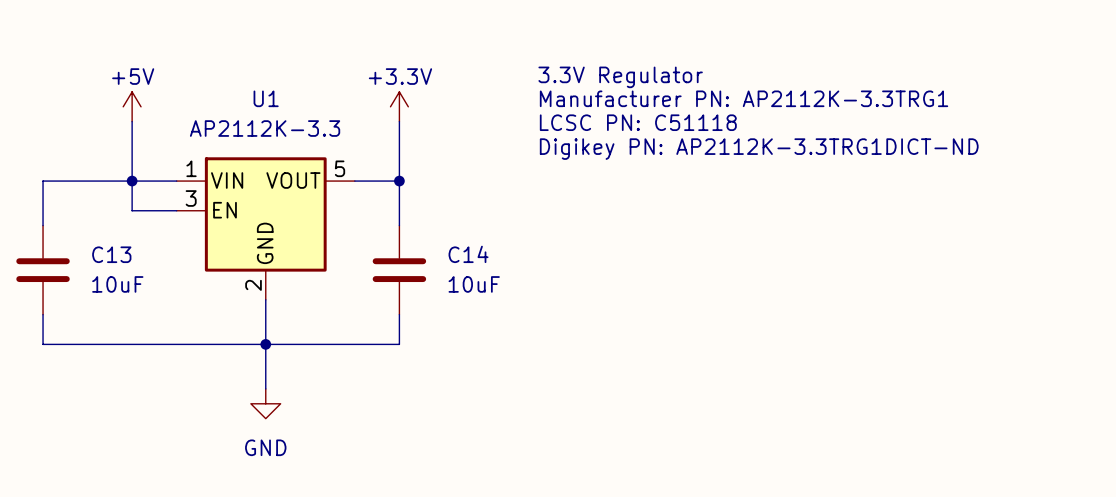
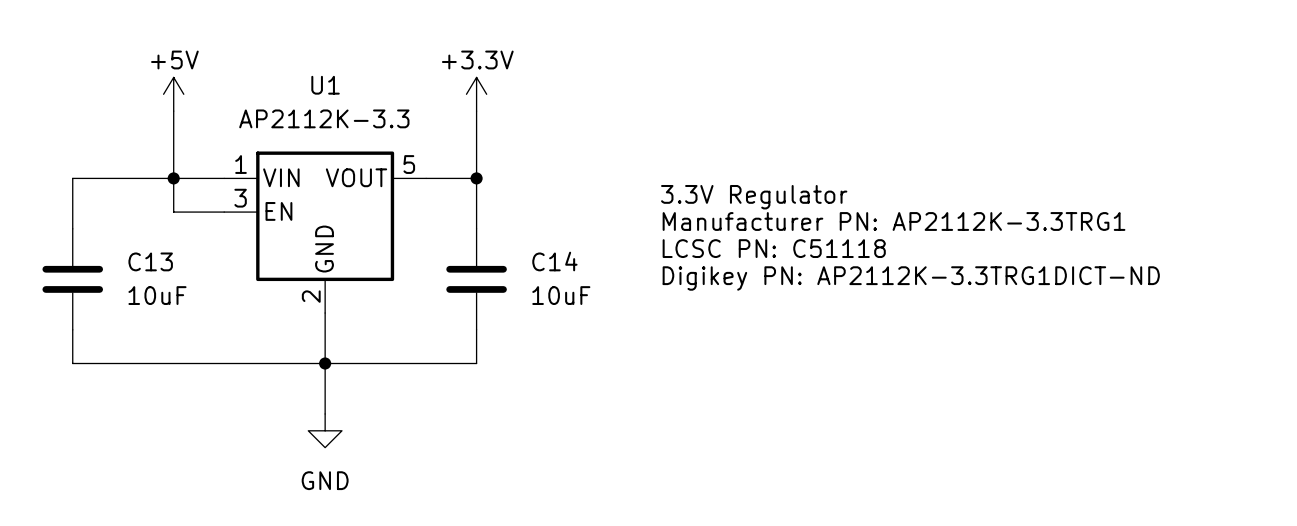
text position: 3.3V Regulator (620, 77) -> 3.3V Regulator (754, 197)
text position: Manufacturer PN: AP2112K-3.3TRG1 (744, 98) -> Manufacturer PN: AP2112K-3.3TRG1 (894, 221)
text position: LCSC PN: C51118 (638, 122) -> LCSC PN: C51118 (774, 248)
text position: Digikey PN: AP2112K-3.3TRG1DICT-ND (759, 149) -> Digikey PN: AP2112K-3.3TRG1DICT-ND (911, 278)

